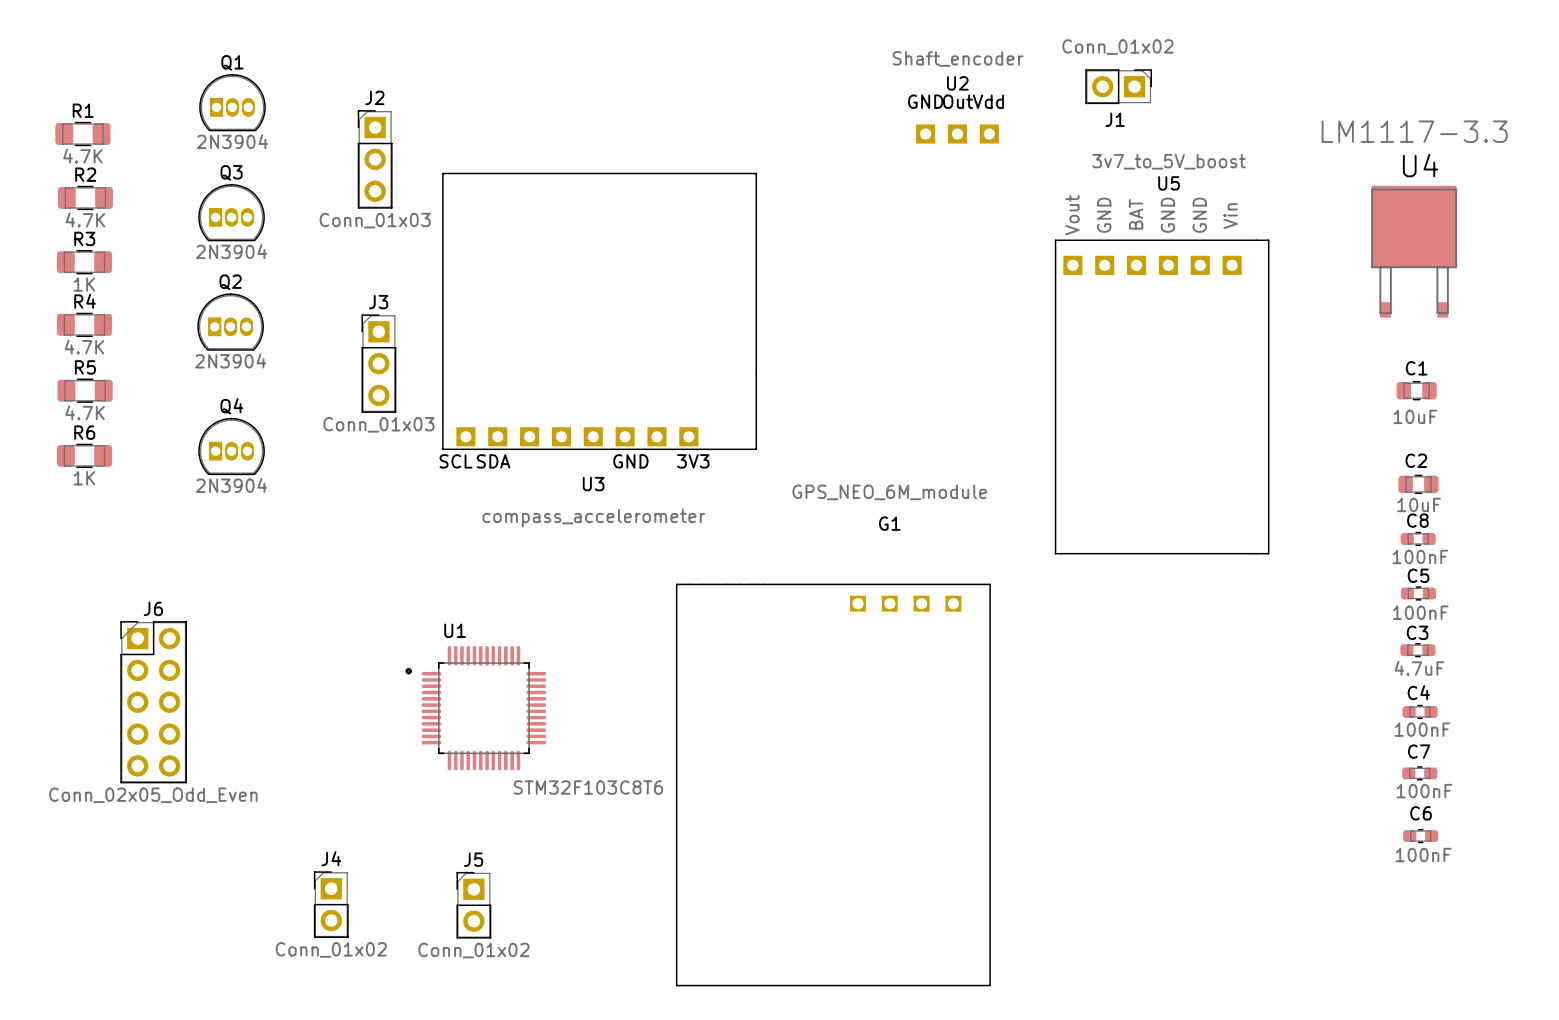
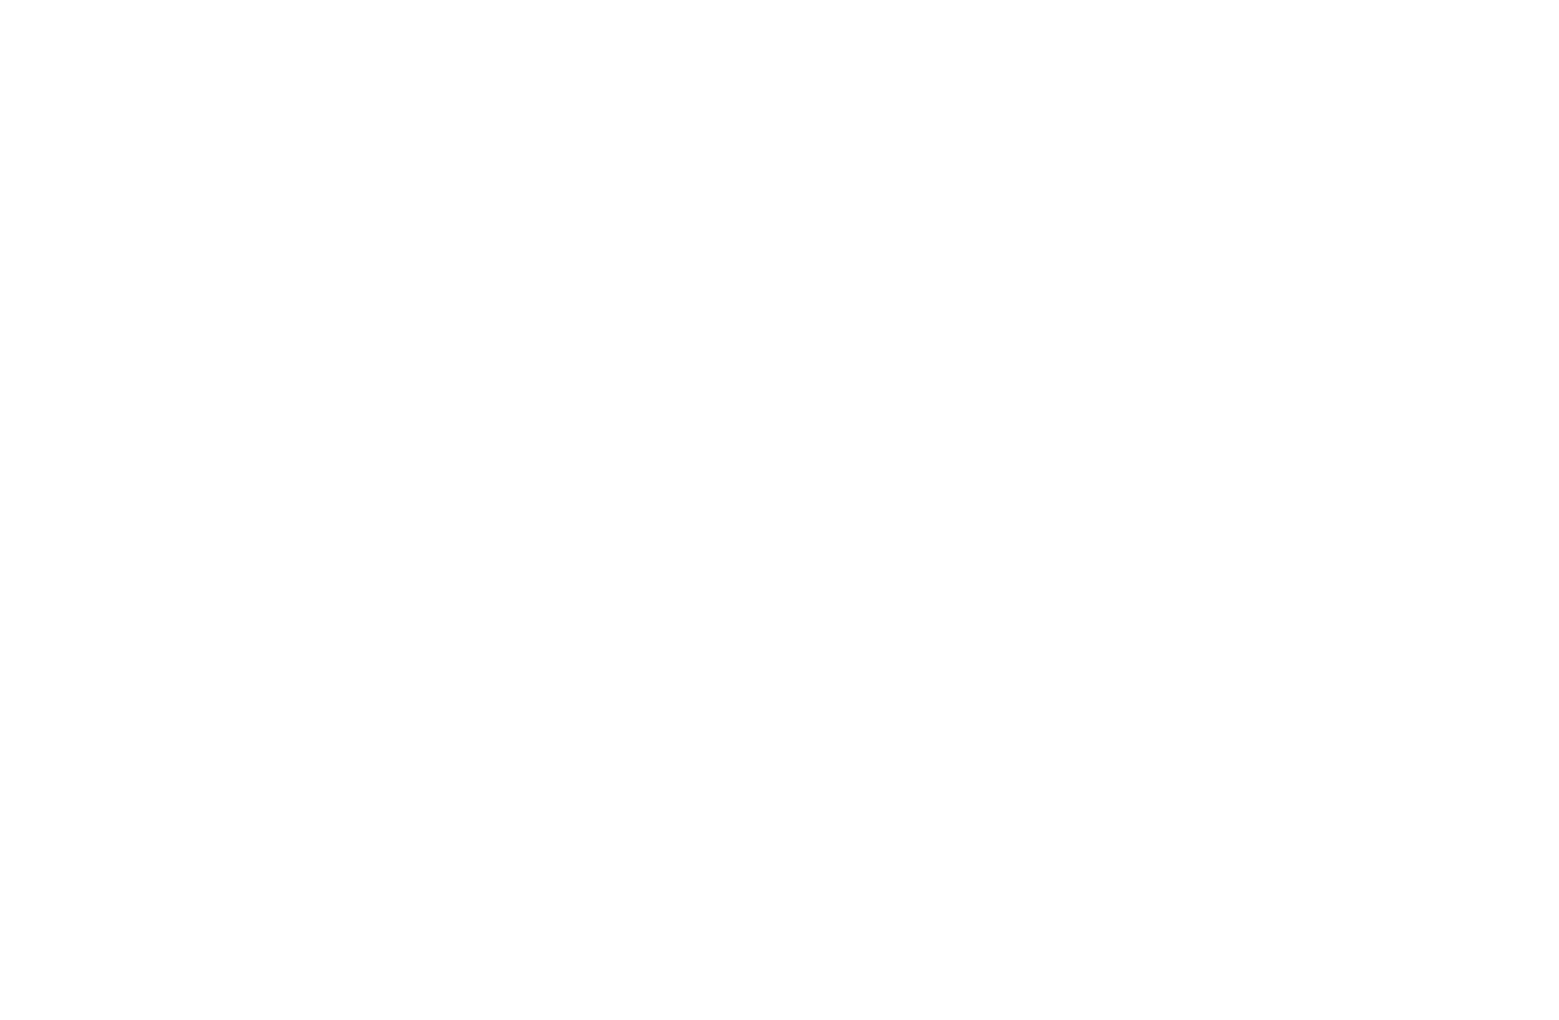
J1: Conn_01x02 (1118, 86) -> none
Q1: 2N3904 (232, 102) -> none
R1: 4.7K (82, 134) -> none
U2: Shaft_encoder (957, 134) -> none
J2: Conn_01x03 (375, 159) -> none
R2: 4.7K (85, 197) -> none
Q3: 2N3904 (231, 212) -> none
U4: LM1117-3.3 (1414, 251) -> none
R3: 1K (84, 262) -> none
U3: compass_accelerometer (599, 311) -> none
Q2: 2N3904 (230, 322) -> none
R4: 4.7K (84, 324) -> none
J3: Conn_01x03 (378, 363) -> none
R5: 4.7K (85, 390) -> none
C1: 10uF (1416, 390) -> none
U5: 3v7_to_5V_boost (1162, 396) -> none
Q4: 2N3904 (231, 446) -> none
R6: 1K (84, 455) -> none
C2: 10uF (1418, 484) -> none
C8: 100nF (1418, 538) -> none
C5: 100nF (1418, 593) -> none
C3: 4.7uF (1417, 650) -> none
J6: Conn_02x05_Odd_Even (153, 702) -> none
U1: STM32F103C8T6 (475, 708) -> none
C4: 100nF (1420, 711) -> none
C7: 100nF (1419, 773) -> none
G1: GPS_NEO_6M_module (833, 784) -> none
C6: 100nF (1420, 836) -> none
J4: Conn_01x02 (331, 904) -> none
J5: Conn_01x02 (473, 905) -> none

